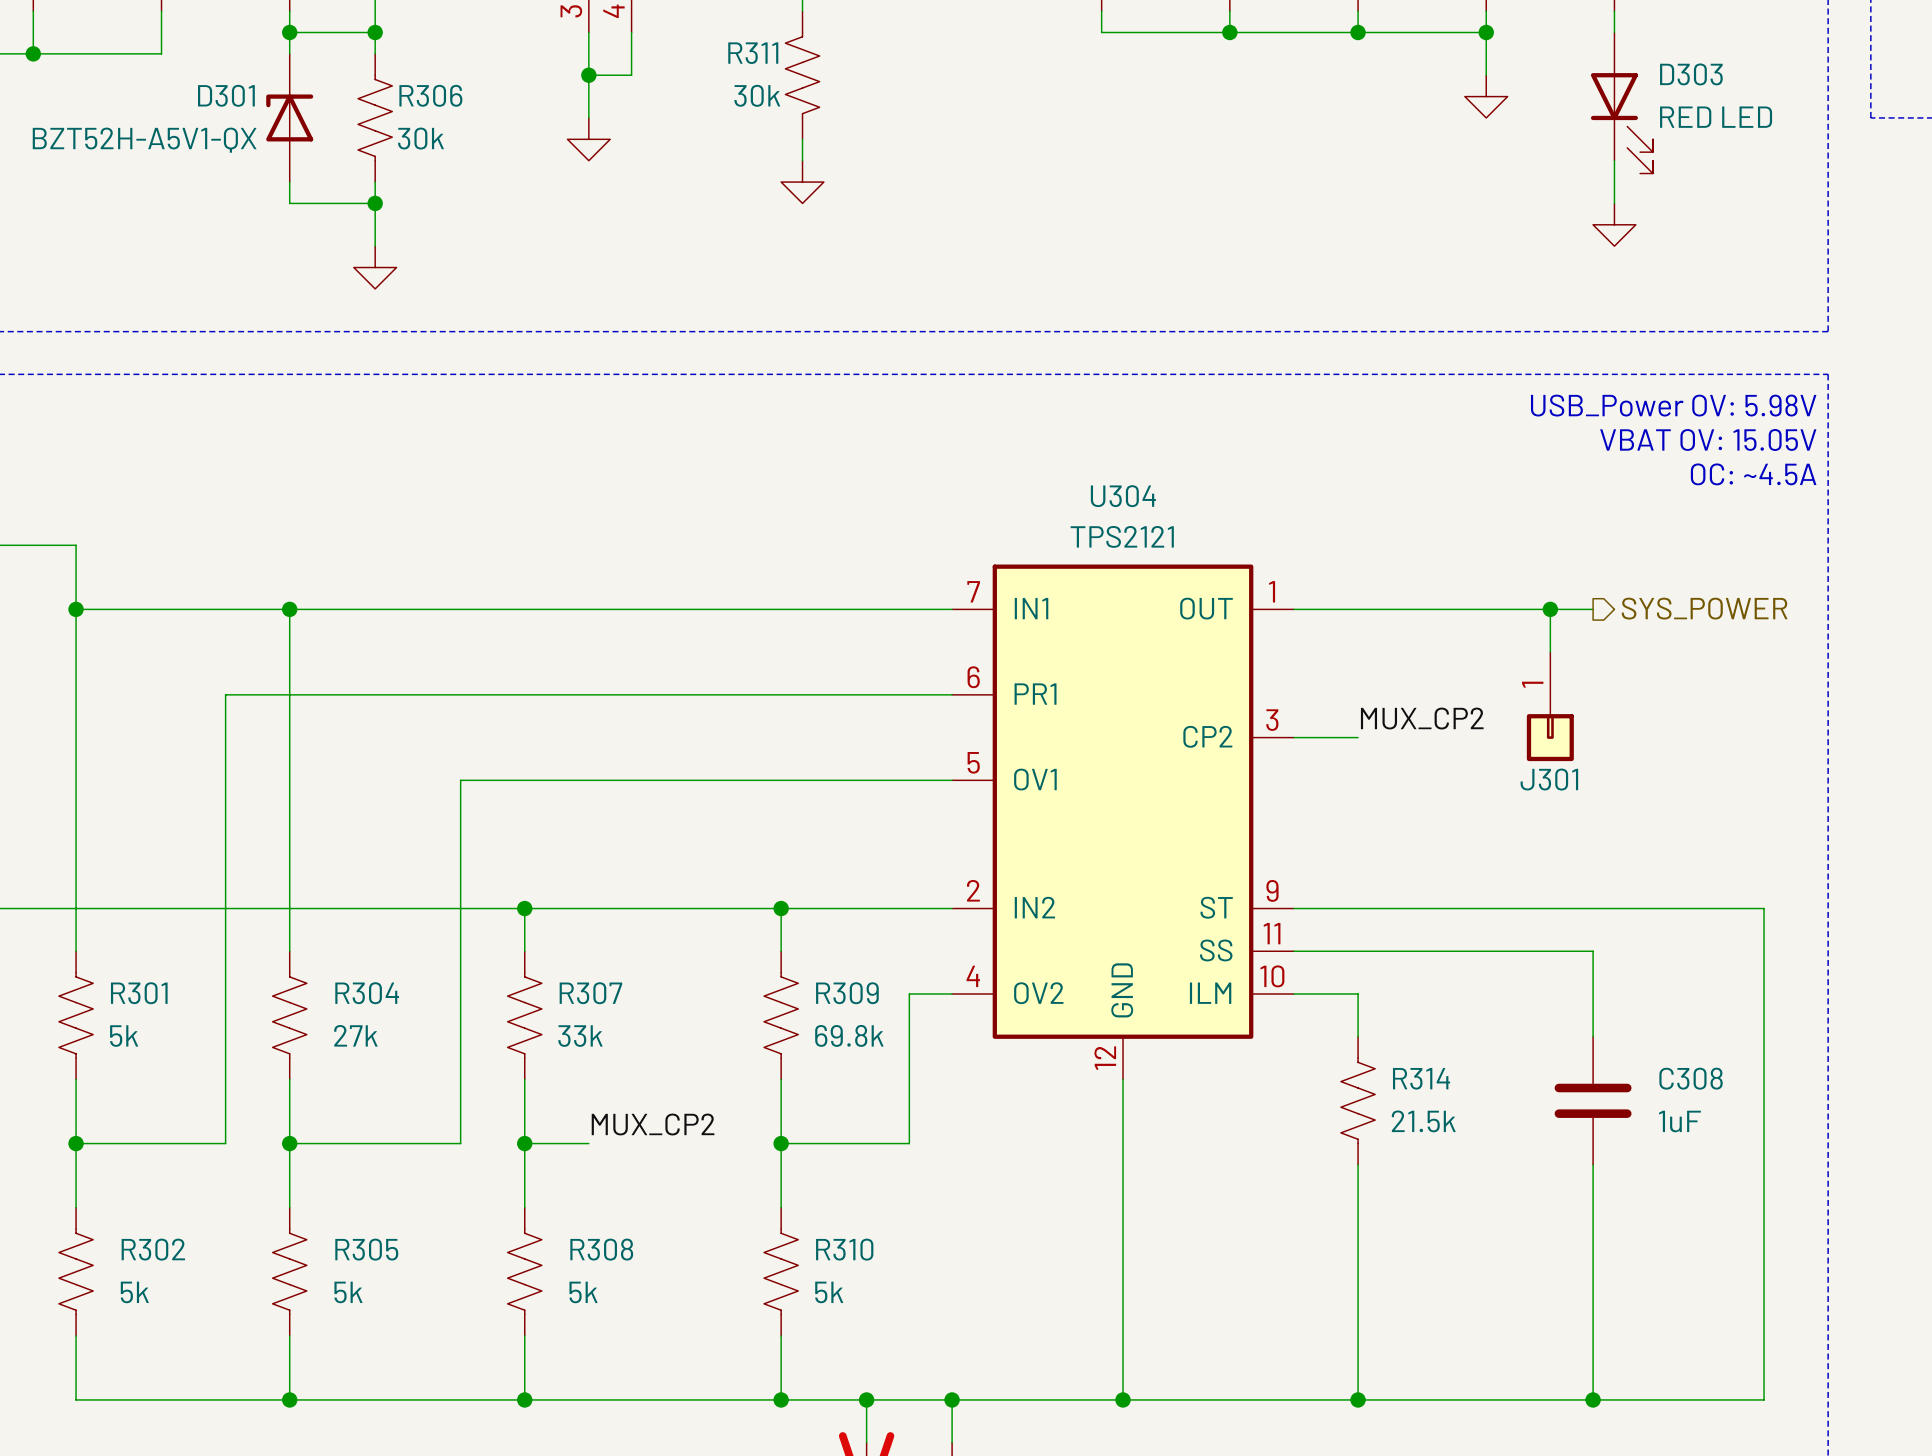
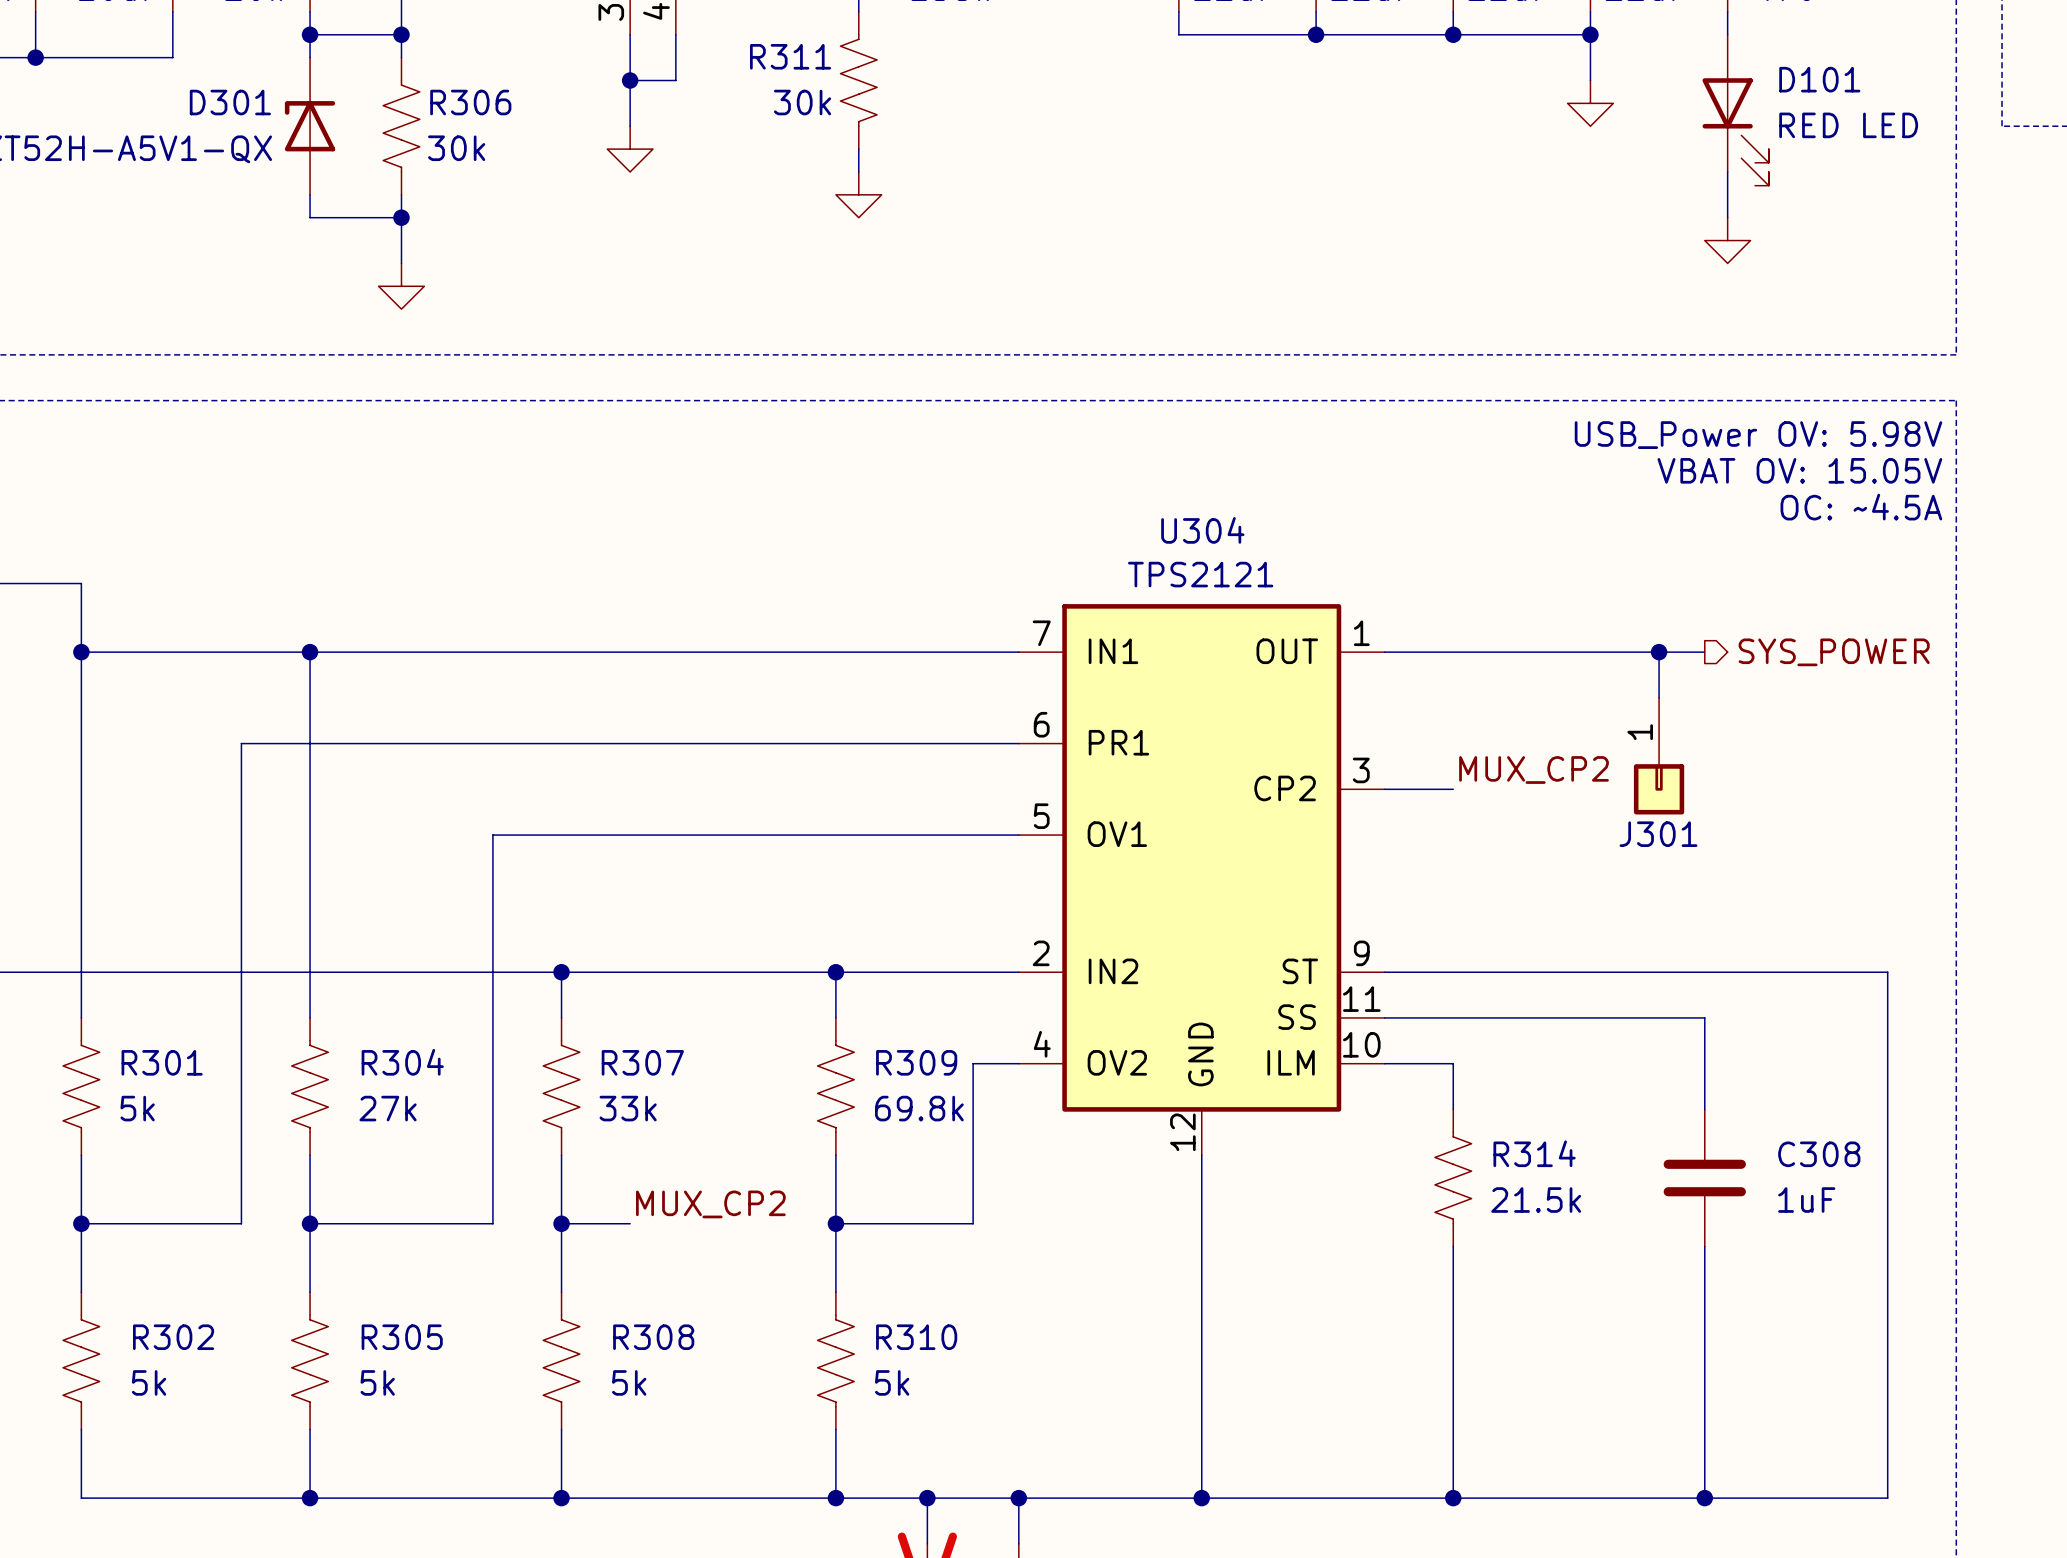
D303 name: D303 (1691, 74) -> D101 (1819, 79)

